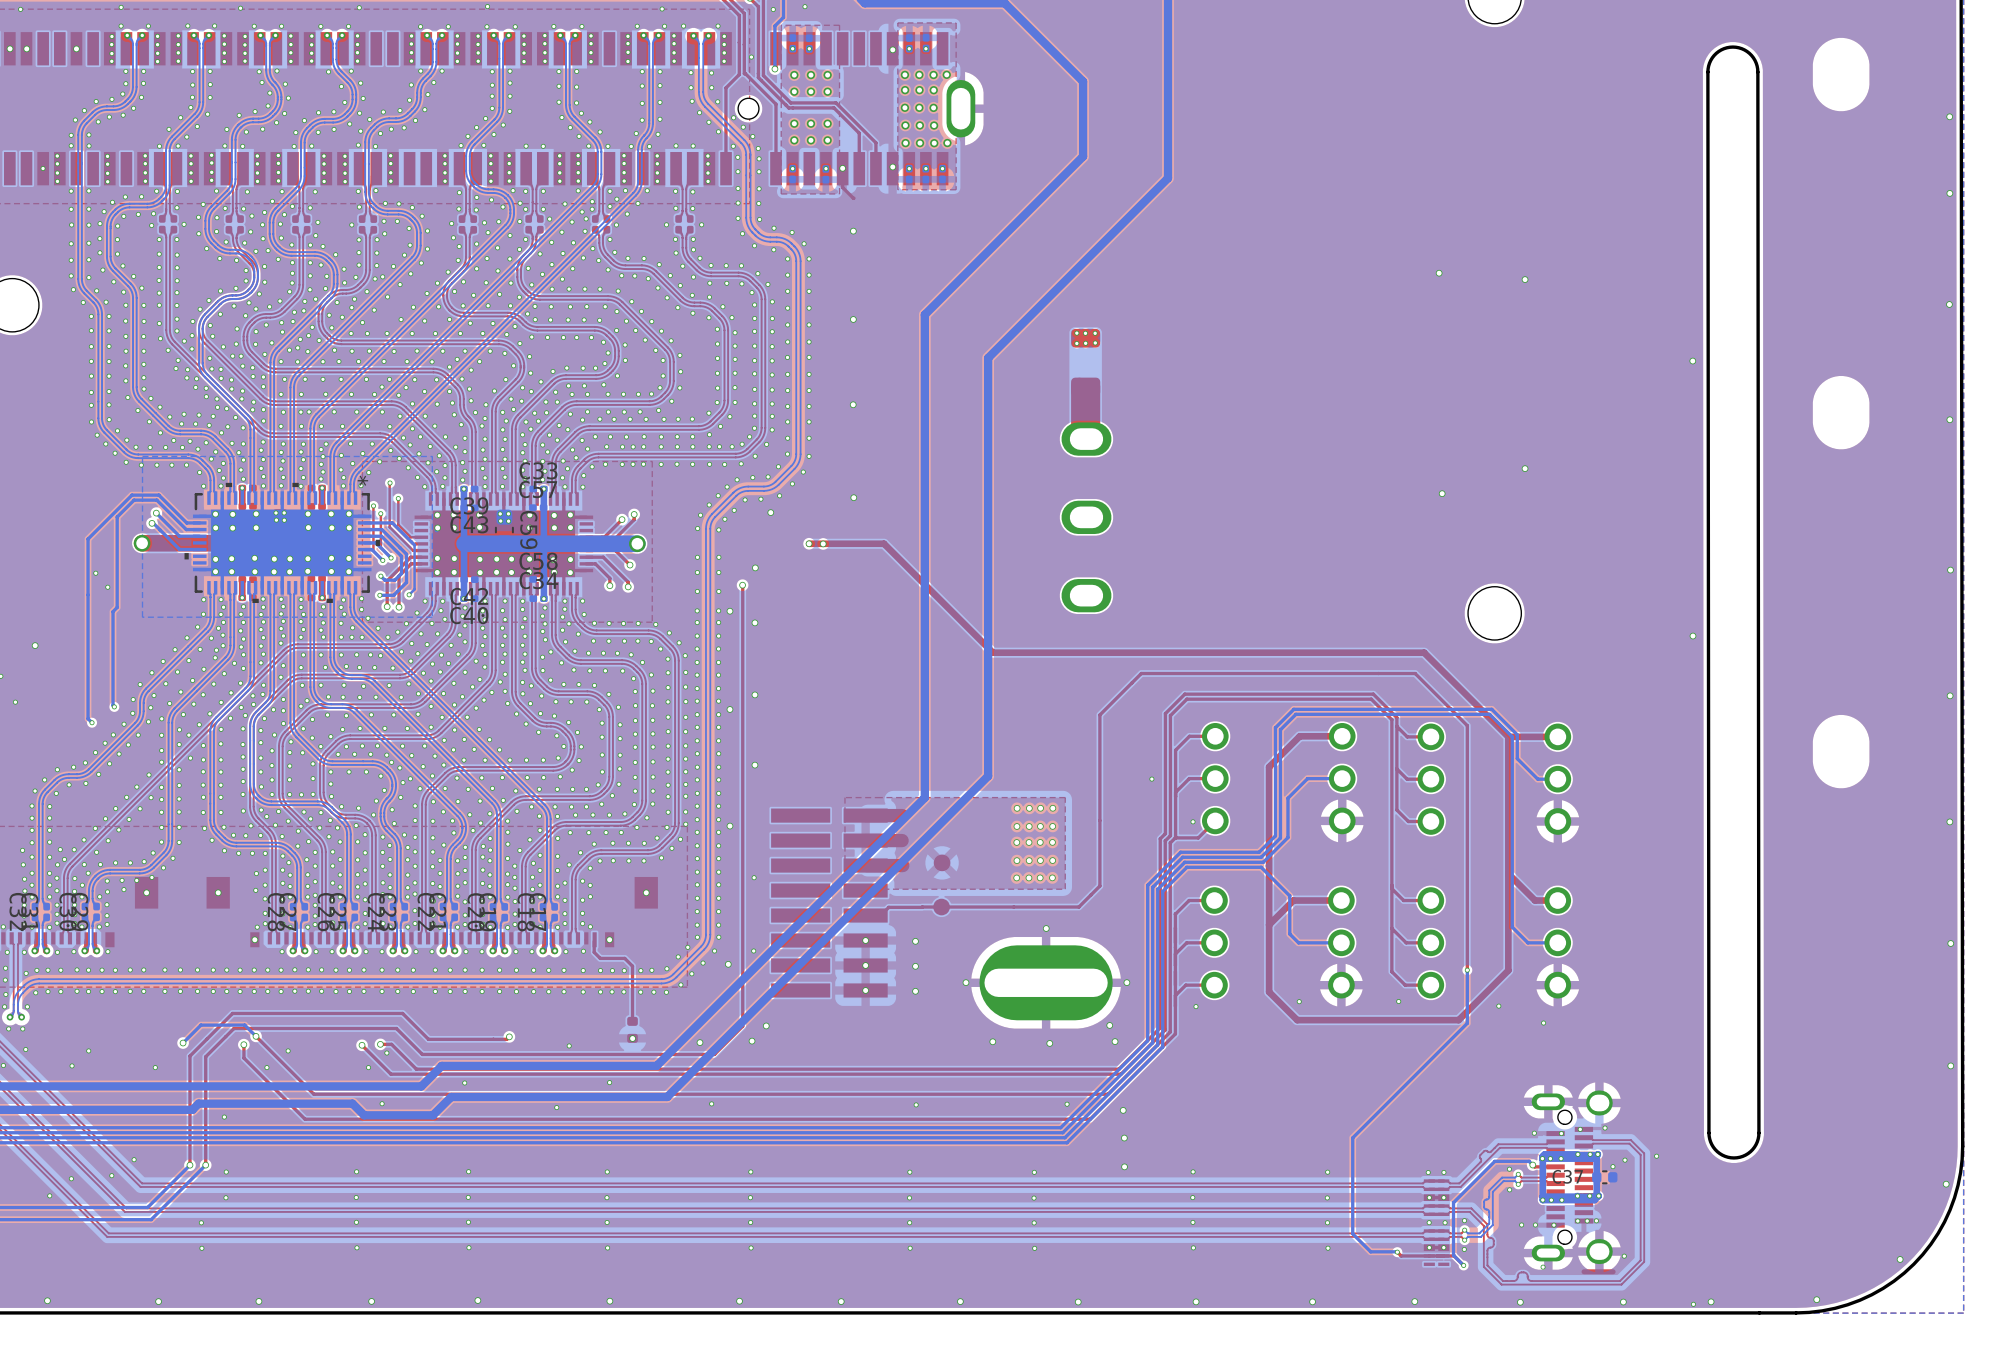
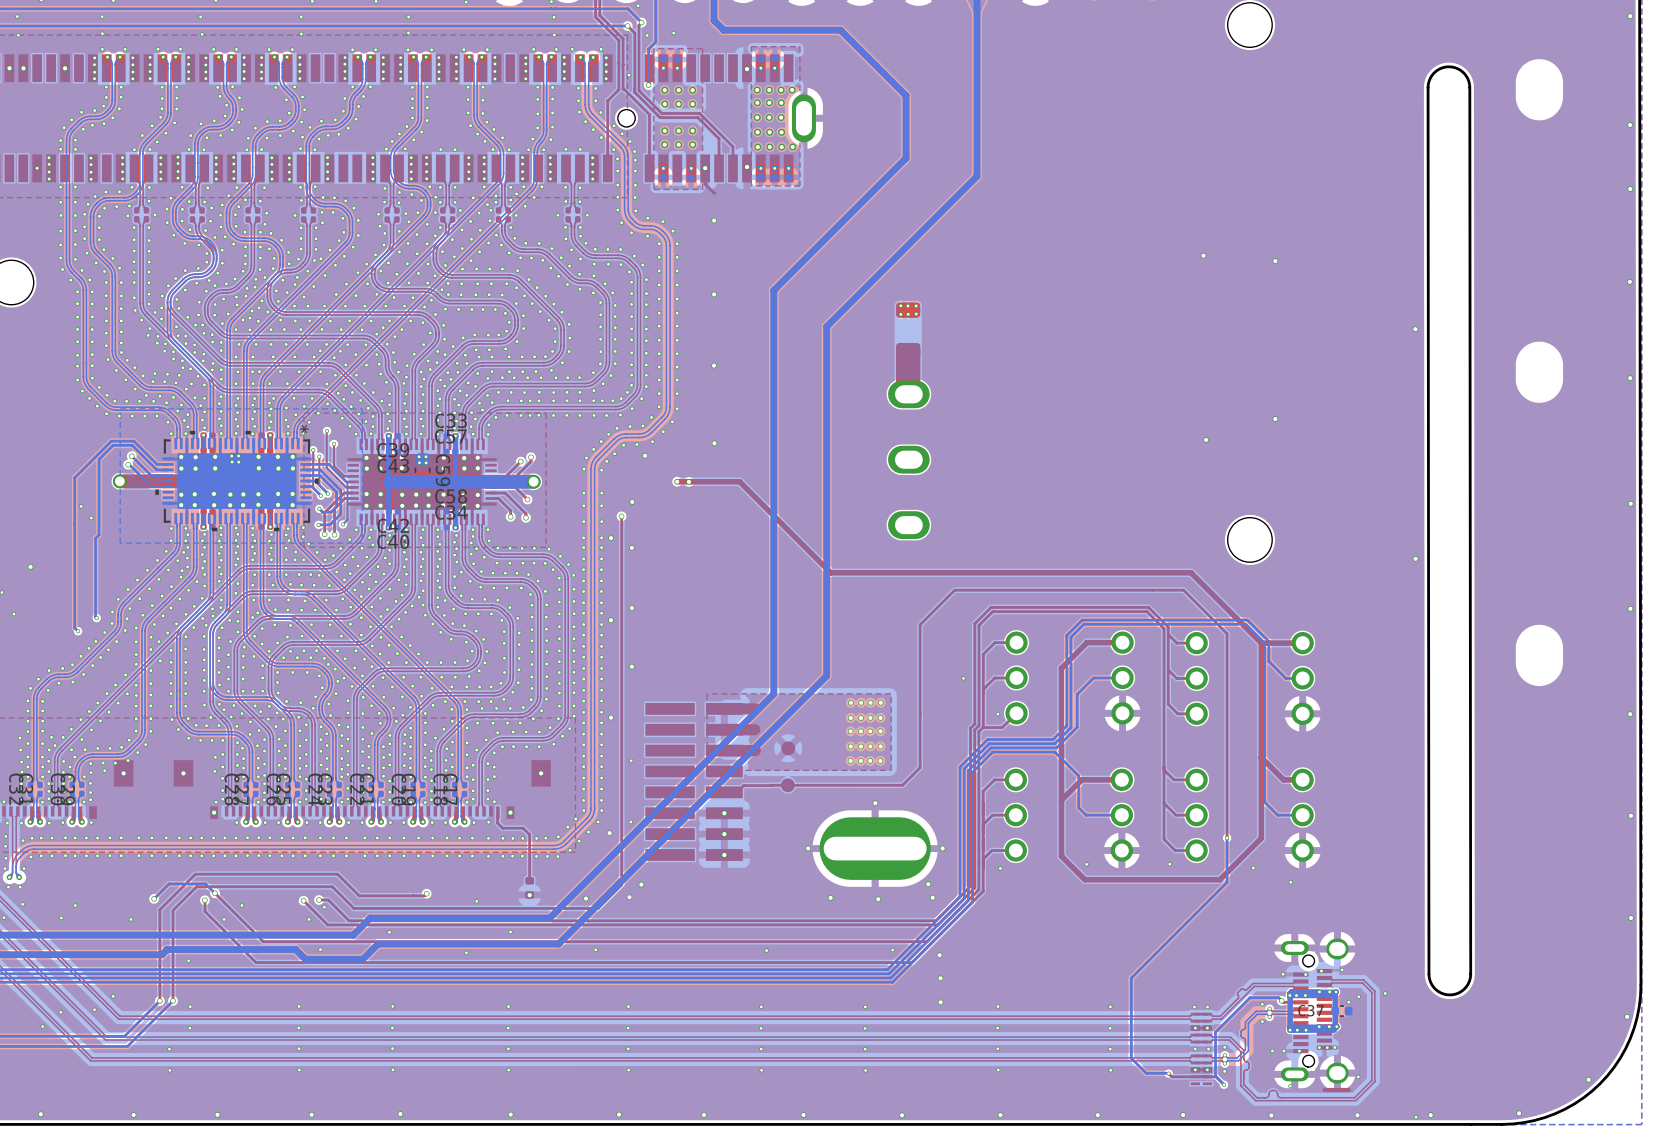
via: (915, 941) -> none
via: (915, 966) -> none
via: (915, 991) -> none

